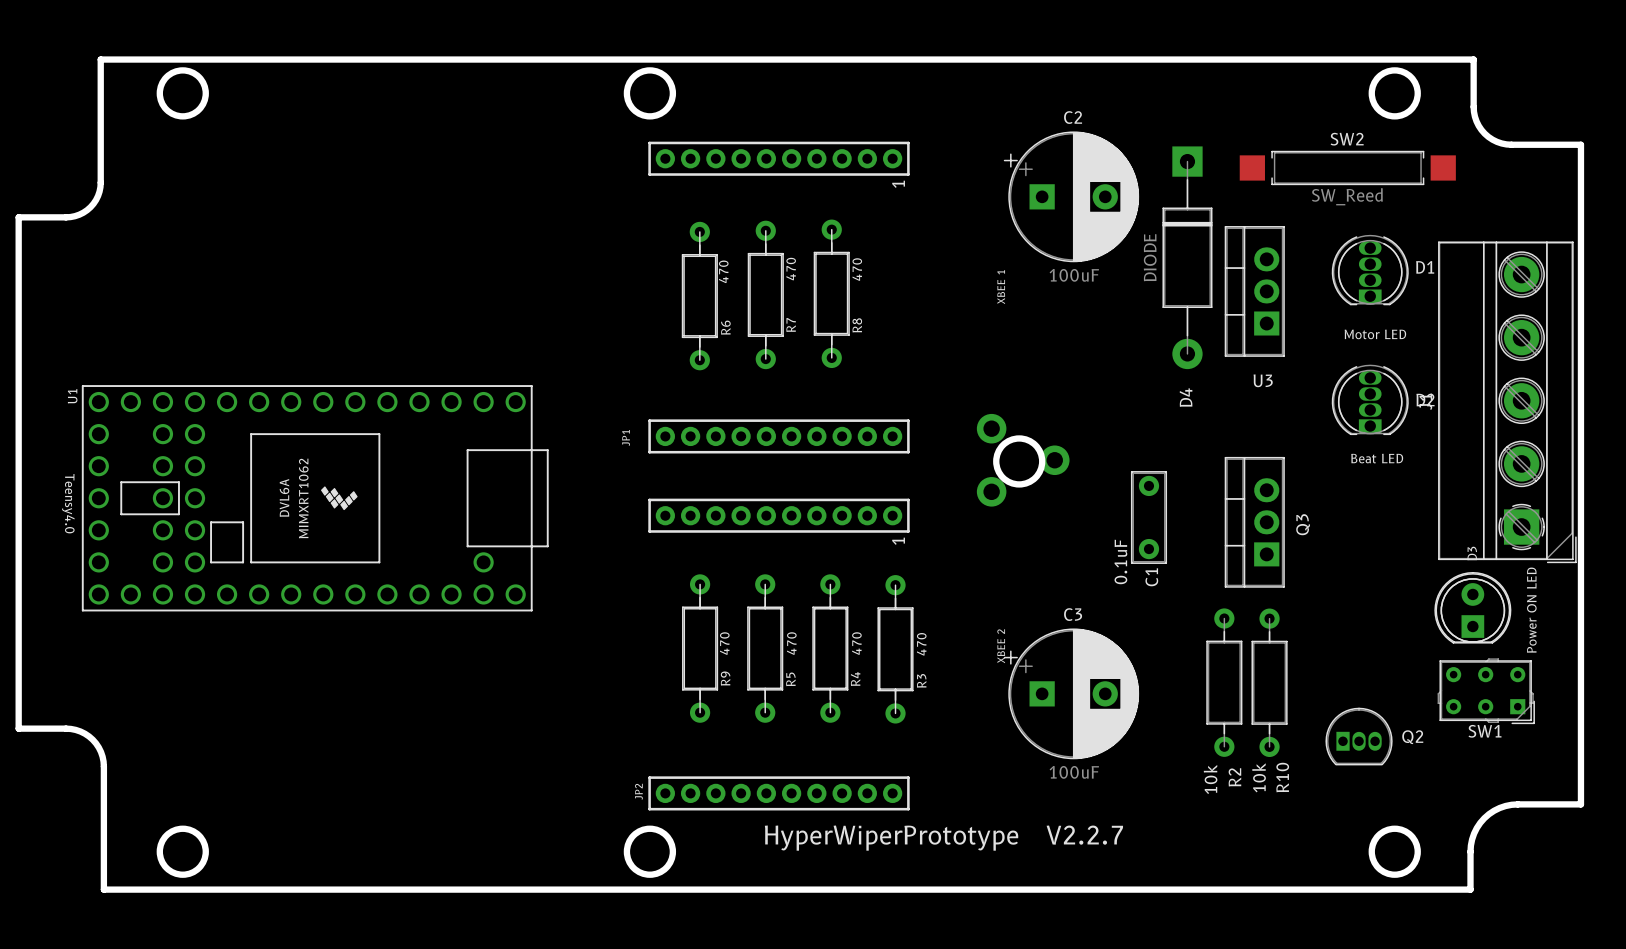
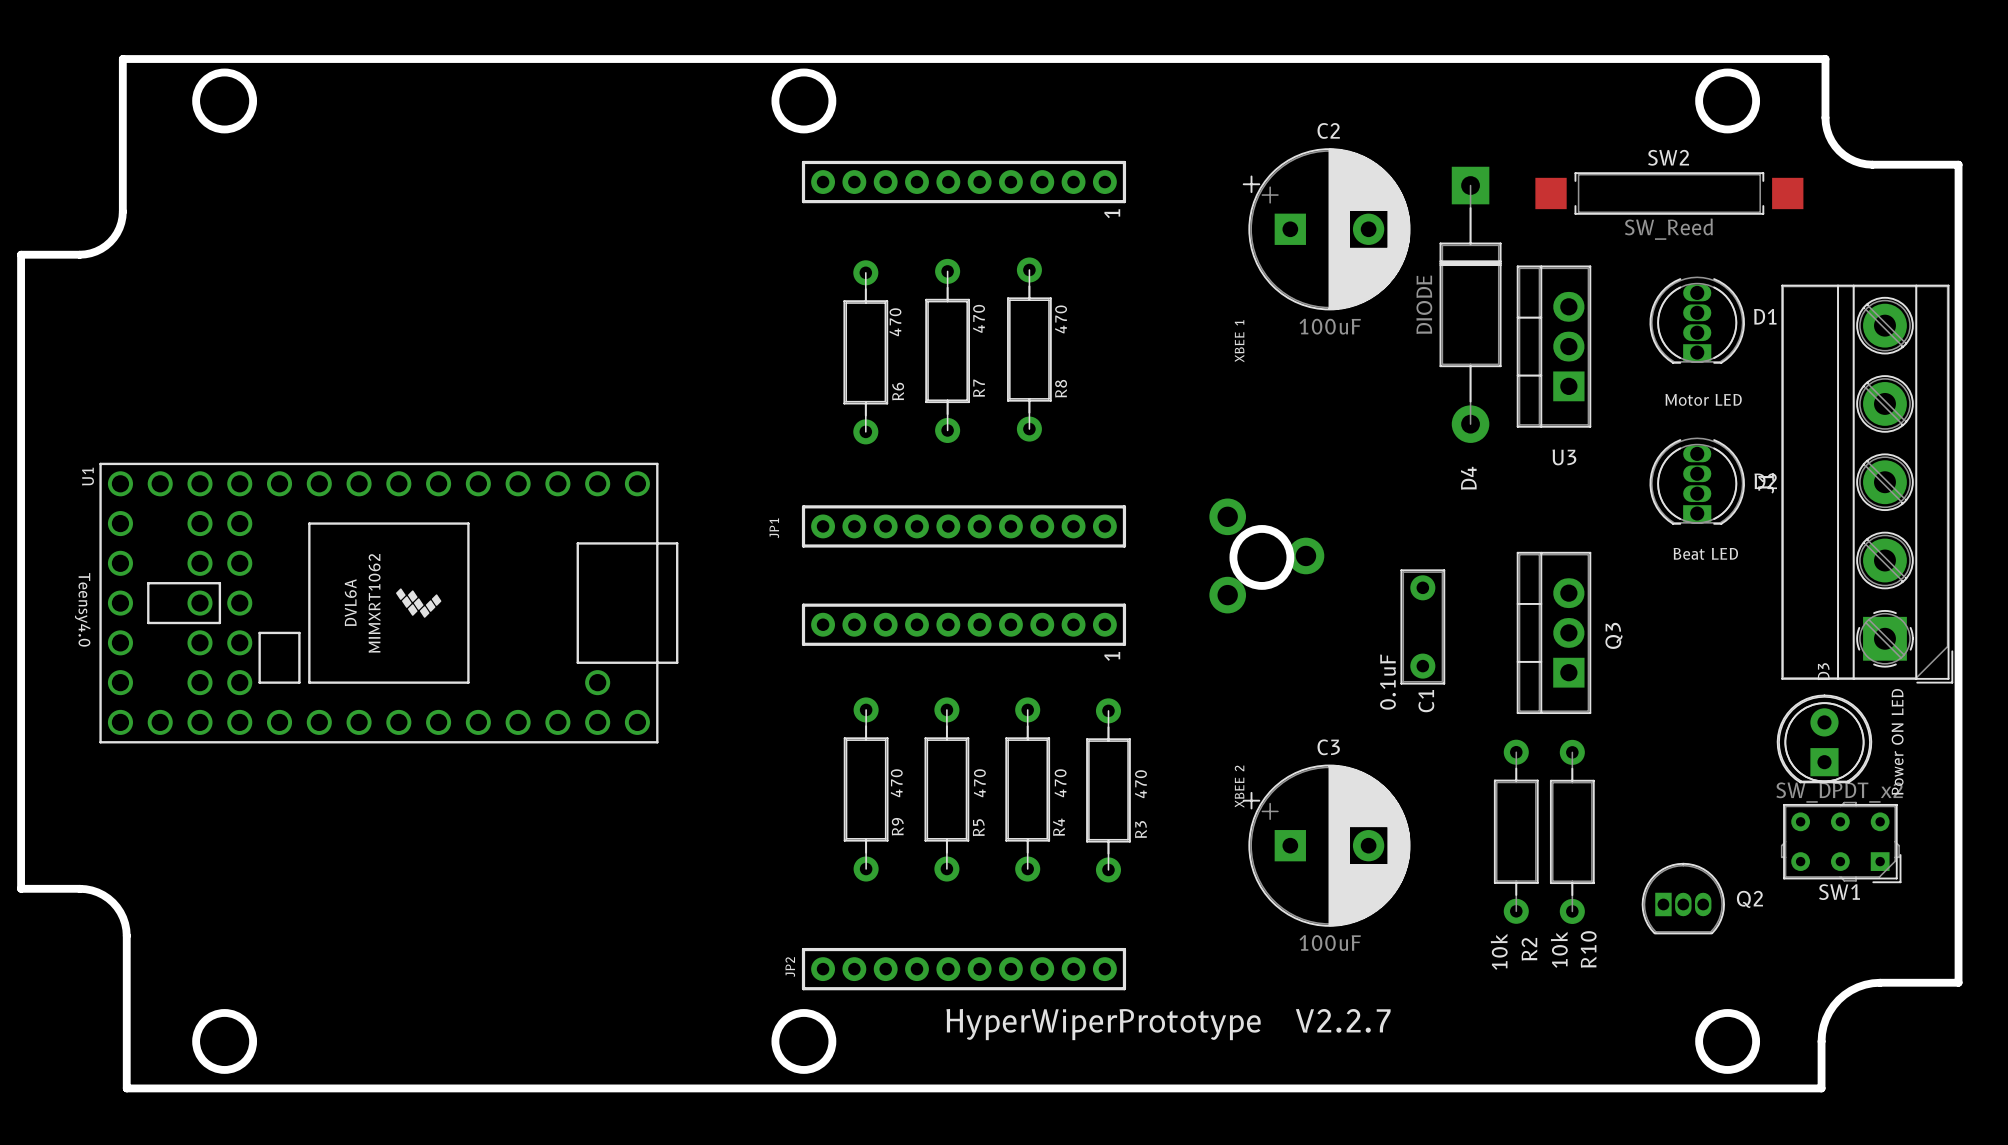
SW1 value: none -> SW_DPDT_x2 (1839, 792)

